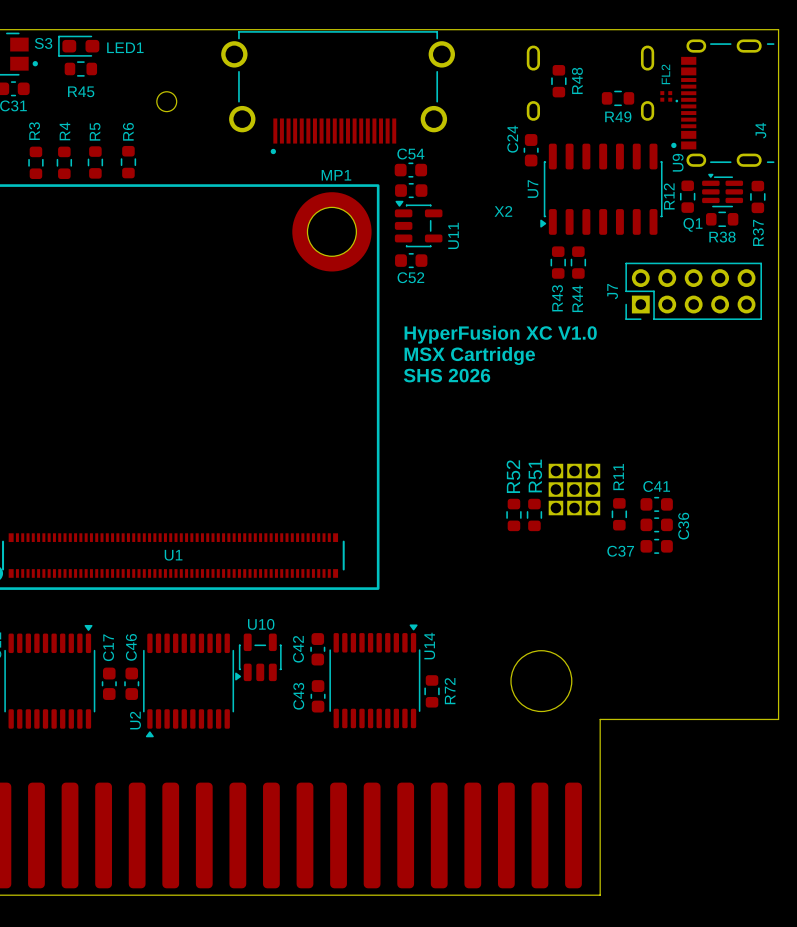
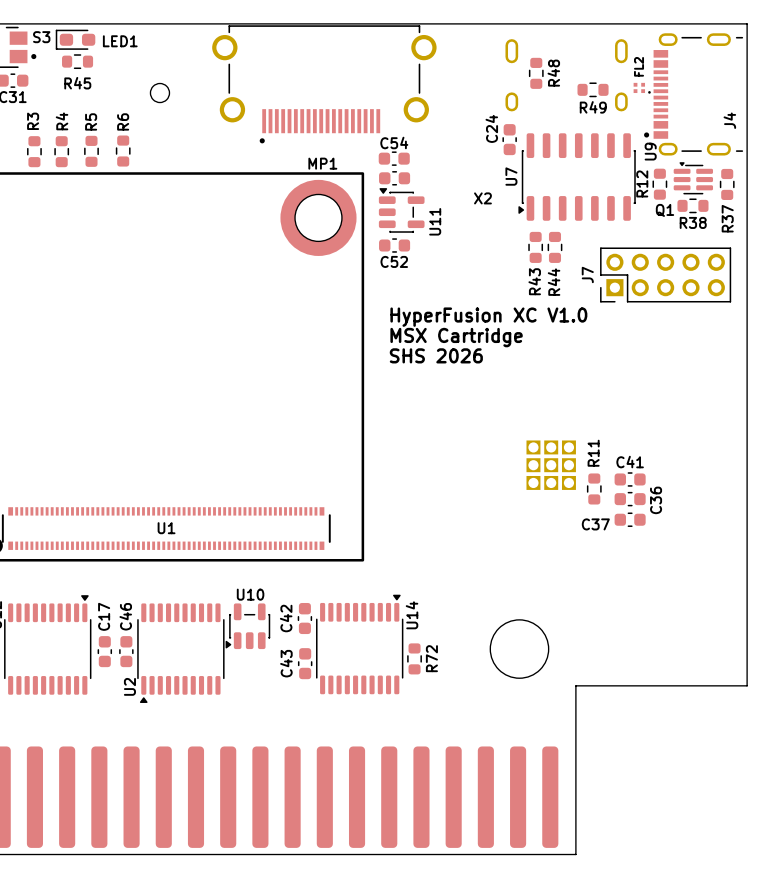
R52: (513, 514) -> none
R51: (534, 514) -> none

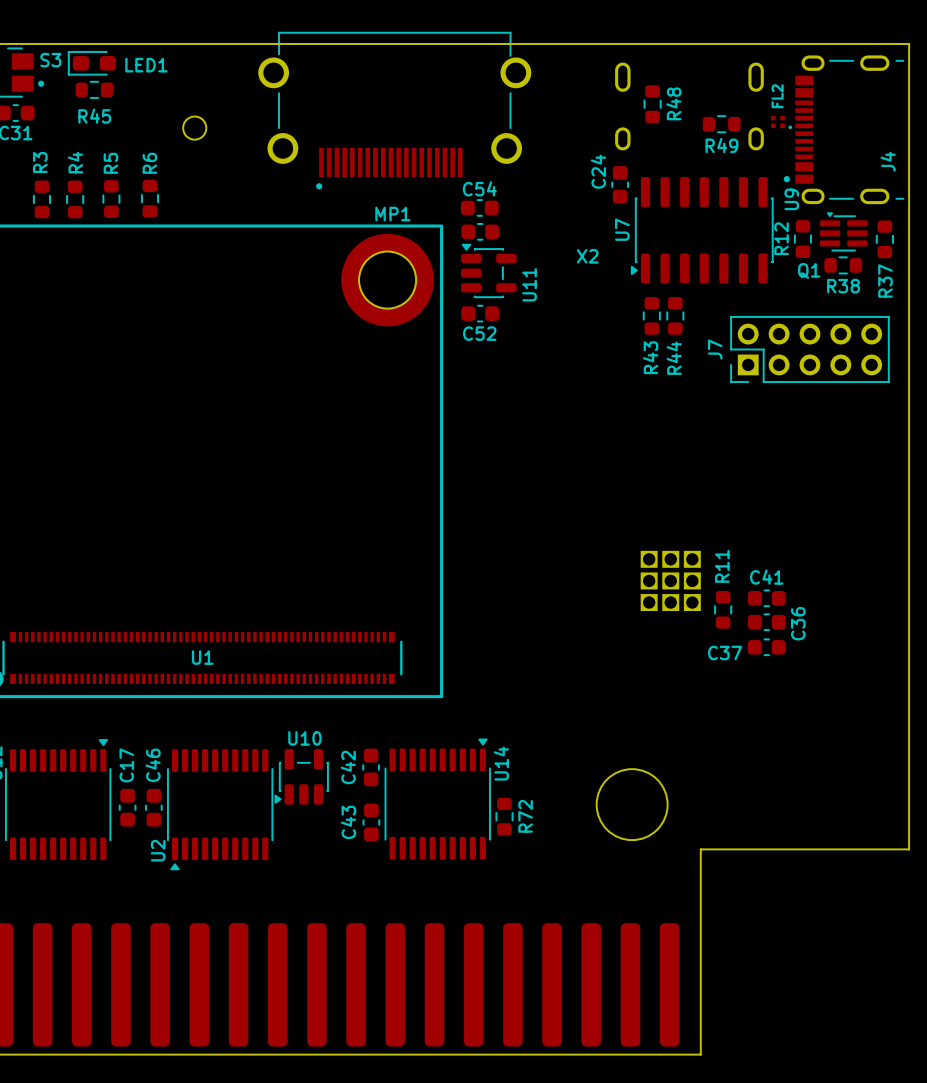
X2 footprint: [212, 25, 437, 144] -> [258, 31, 532, 190]
text: HyperFusion XC V1.0 (488, 317) -> none
text: MSX Cartridge (456, 337) -> none
text: SHS 2026 (436, 355) -> none

